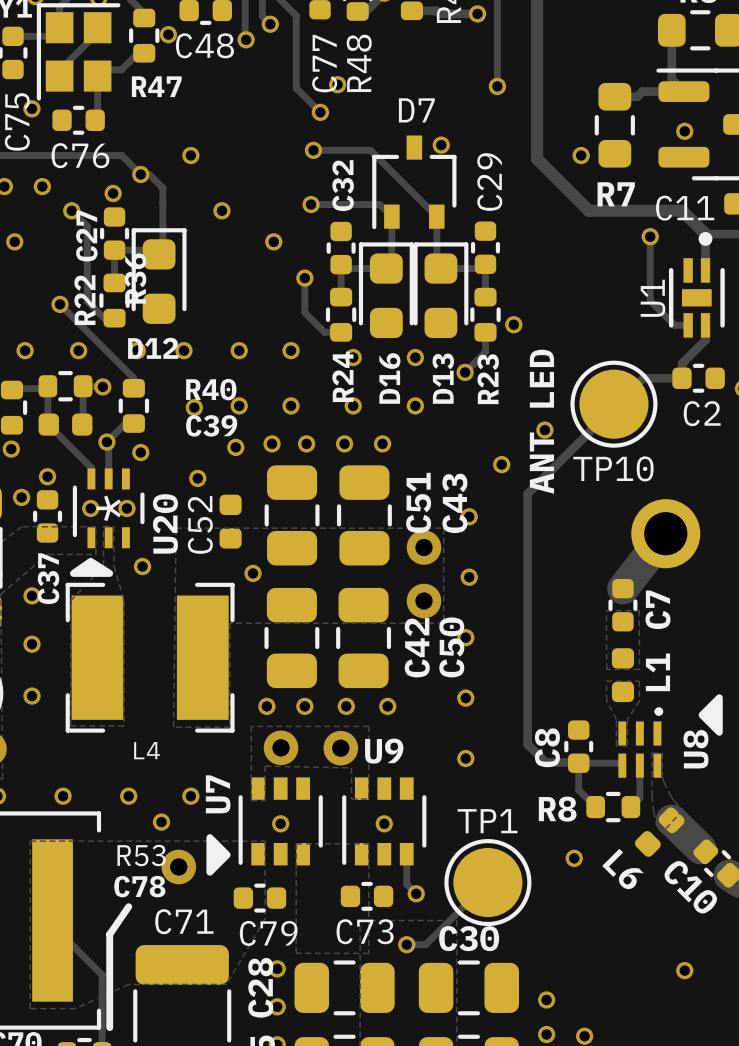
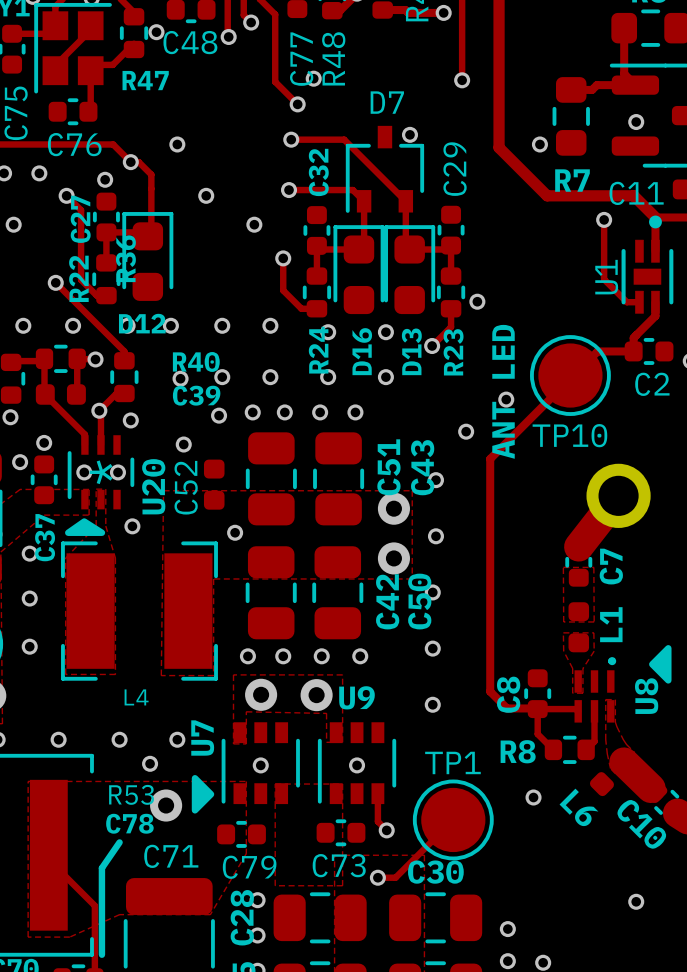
via: (32, 108) -> none

